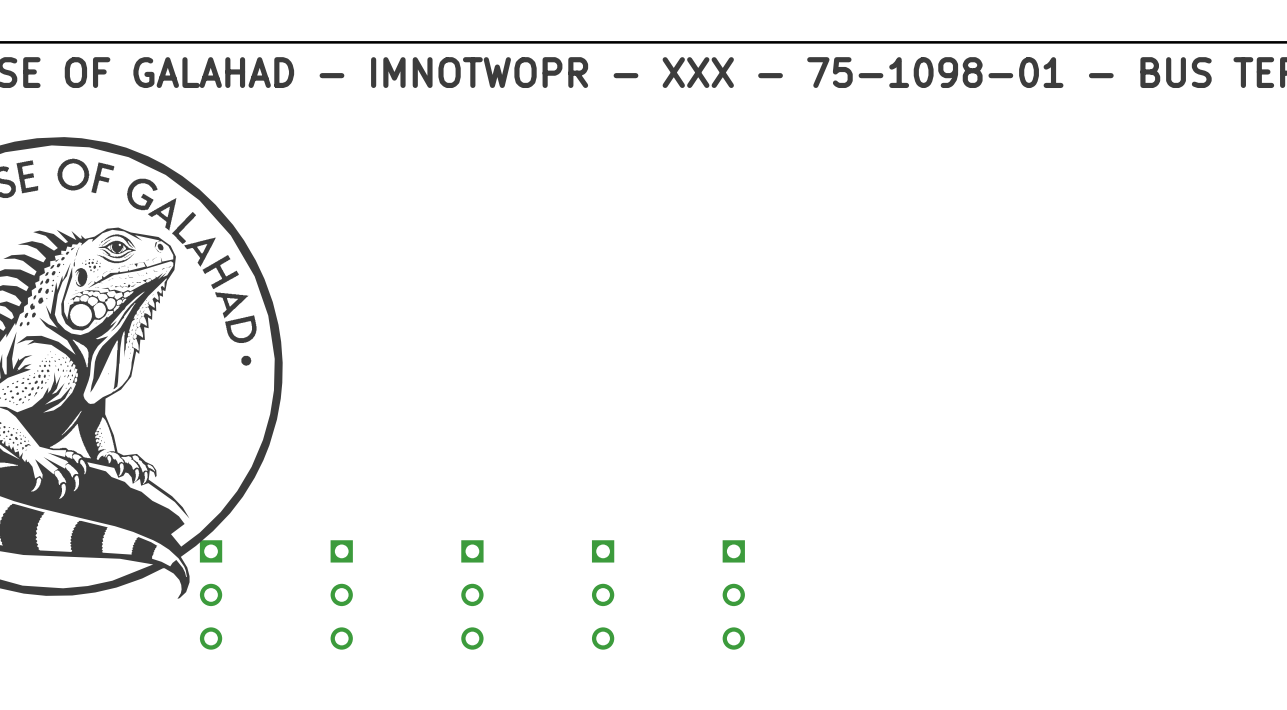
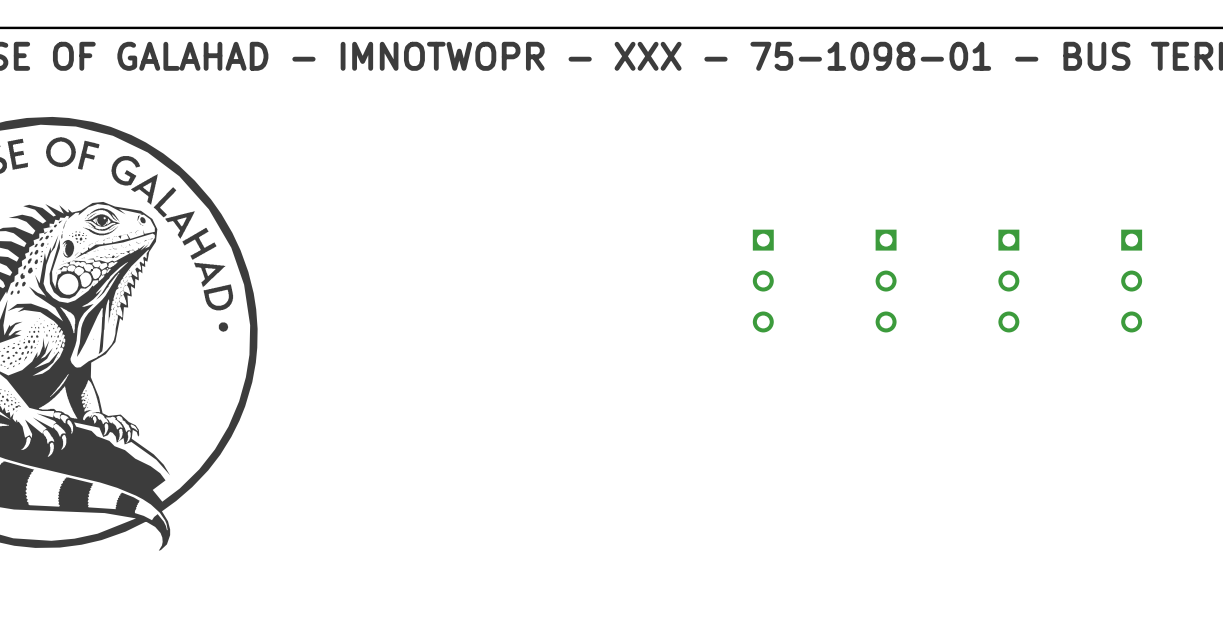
part: none -> (763, 281)
part: none -> (886, 281)
part: none -> (1008, 281)
part: none -> (1131, 281)
part: (211, 594) -> none
part: (341, 594) -> none
part: (472, 594) -> none
part: (603, 594) -> none
part: (733, 594) -> none

